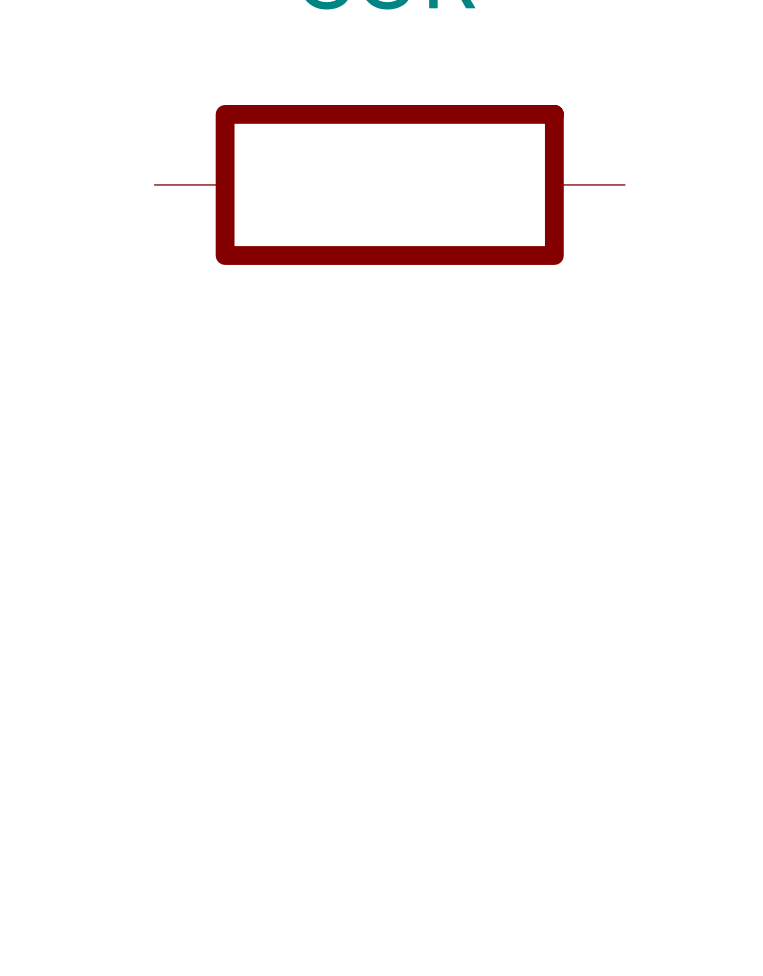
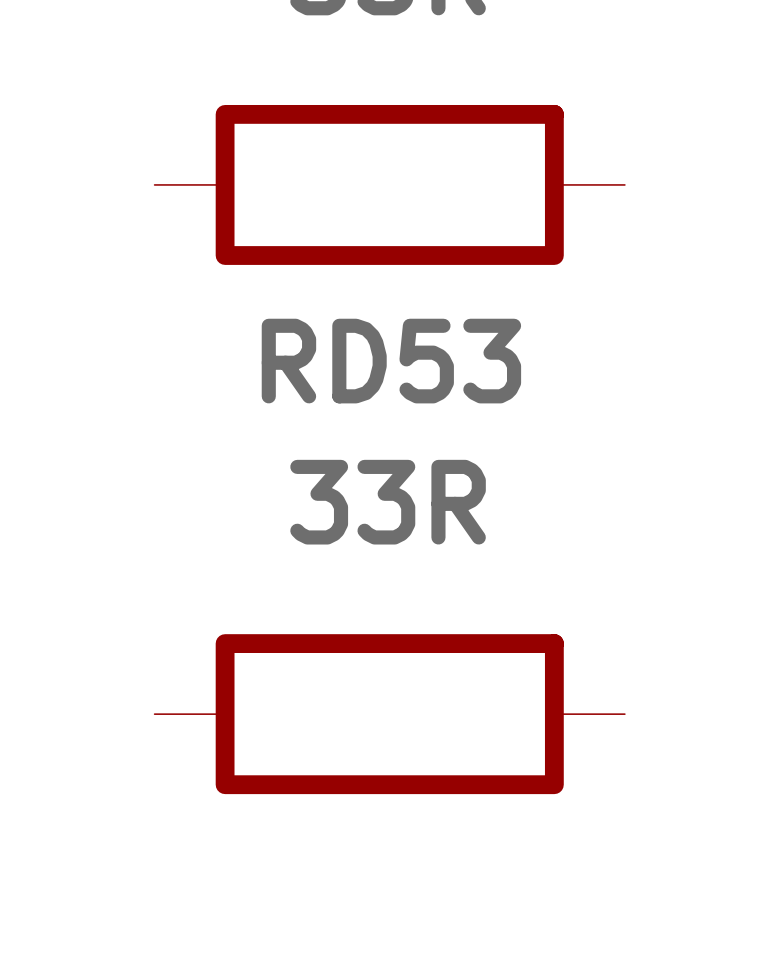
RD53: none -> 33R (389, 714)

